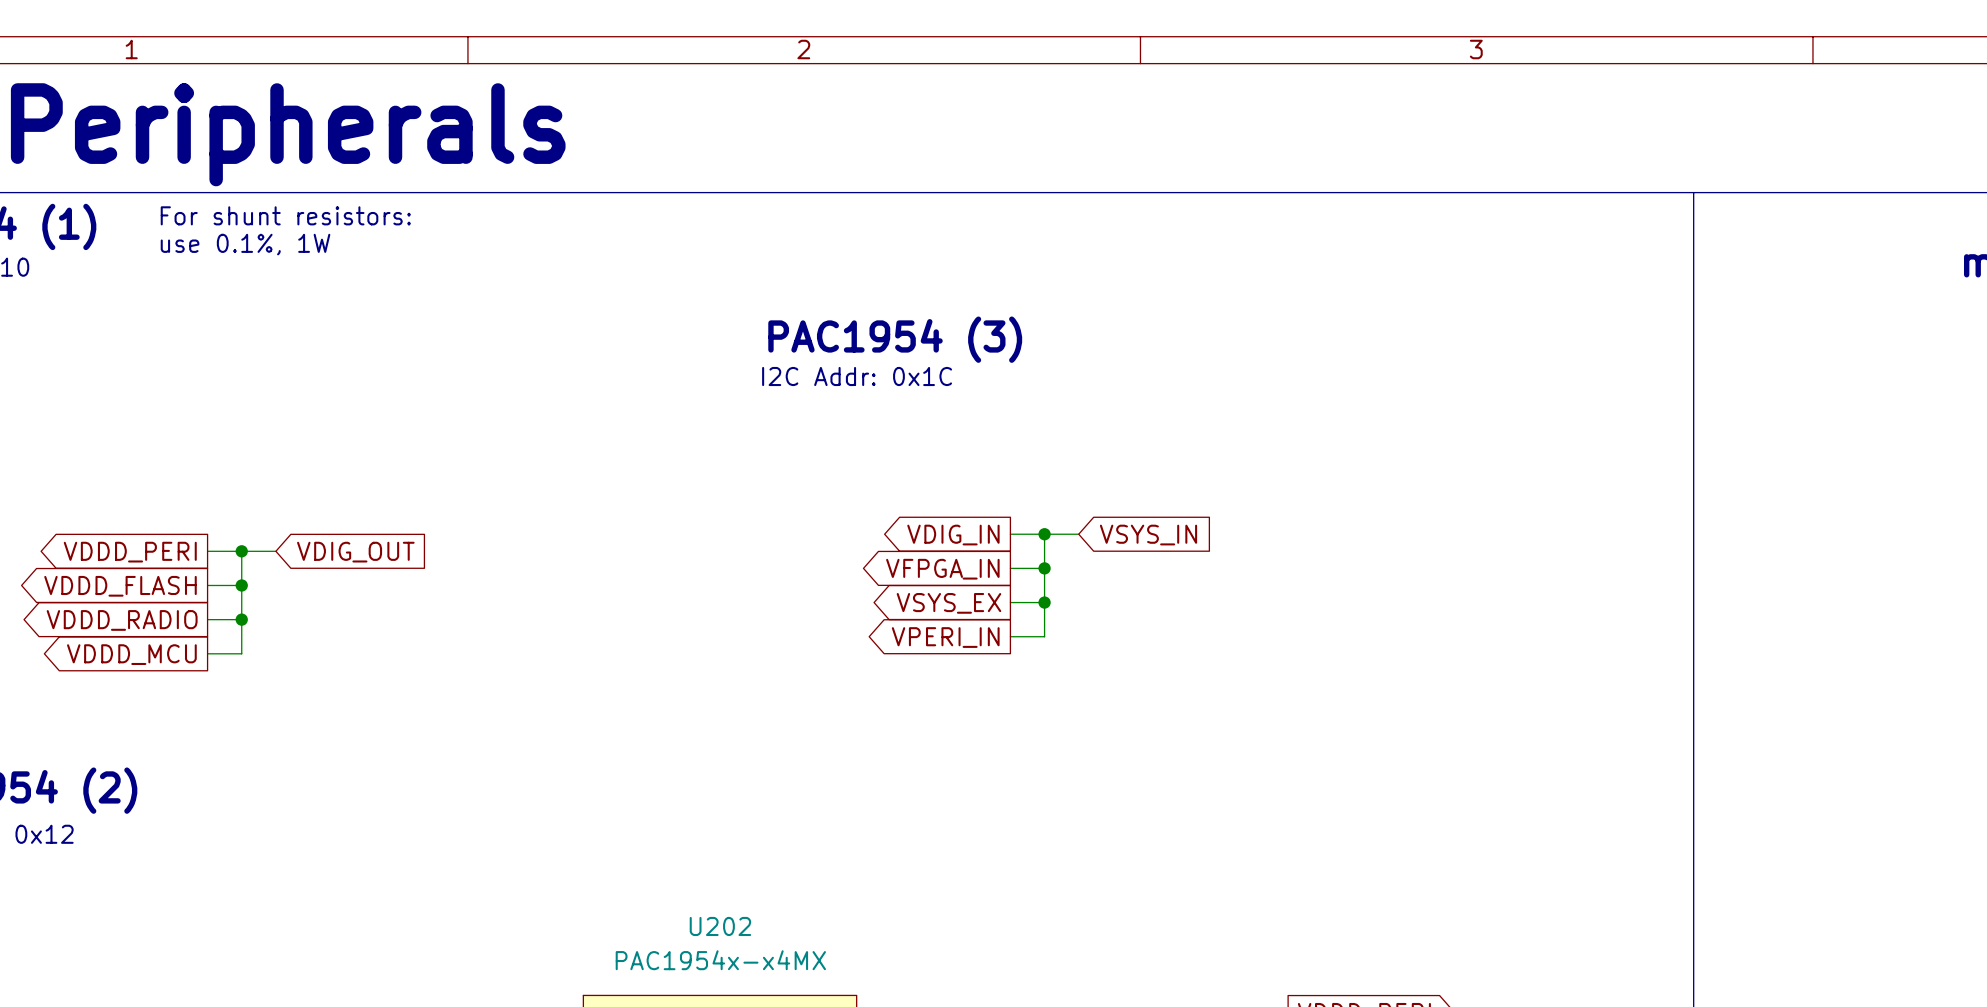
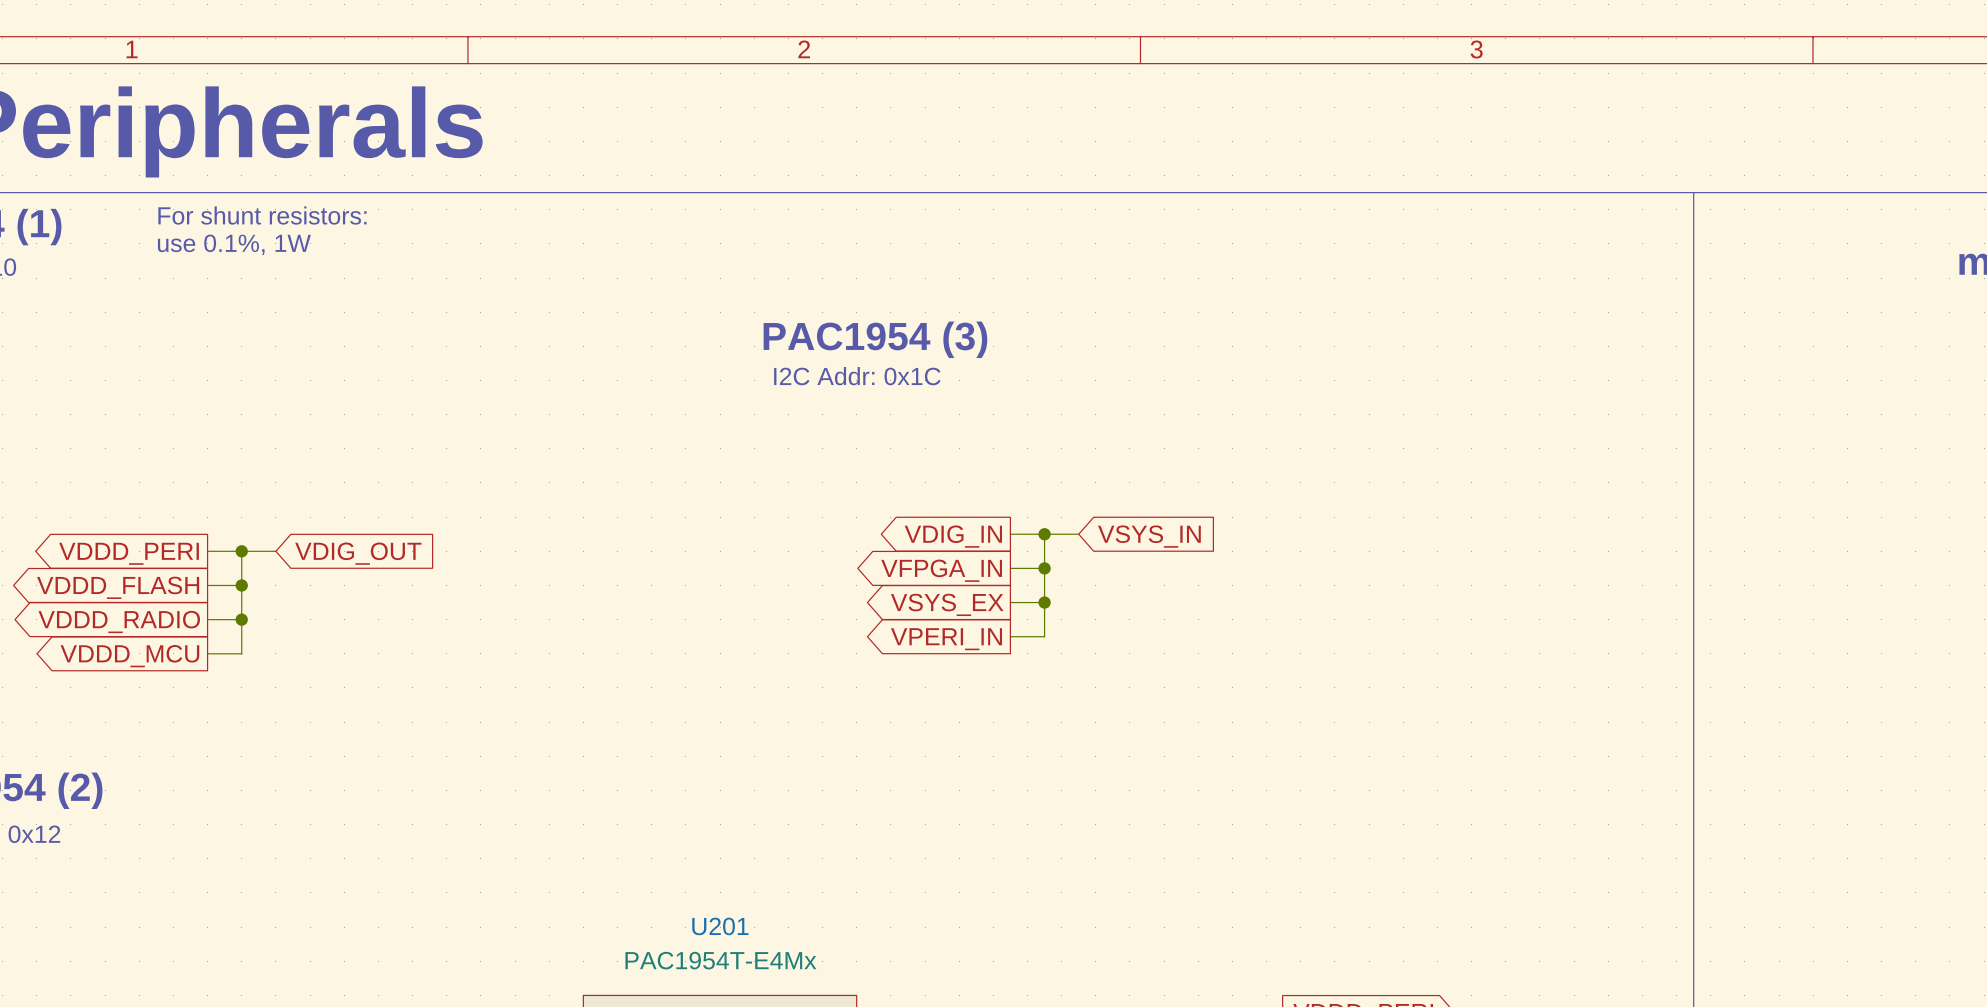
U202 name: U202 (720, 926) -> U201 (720, 926)
U202 value: PAC1954x-x4MX (720, 960) -> PAC1954T-E4Mx (720, 960)

